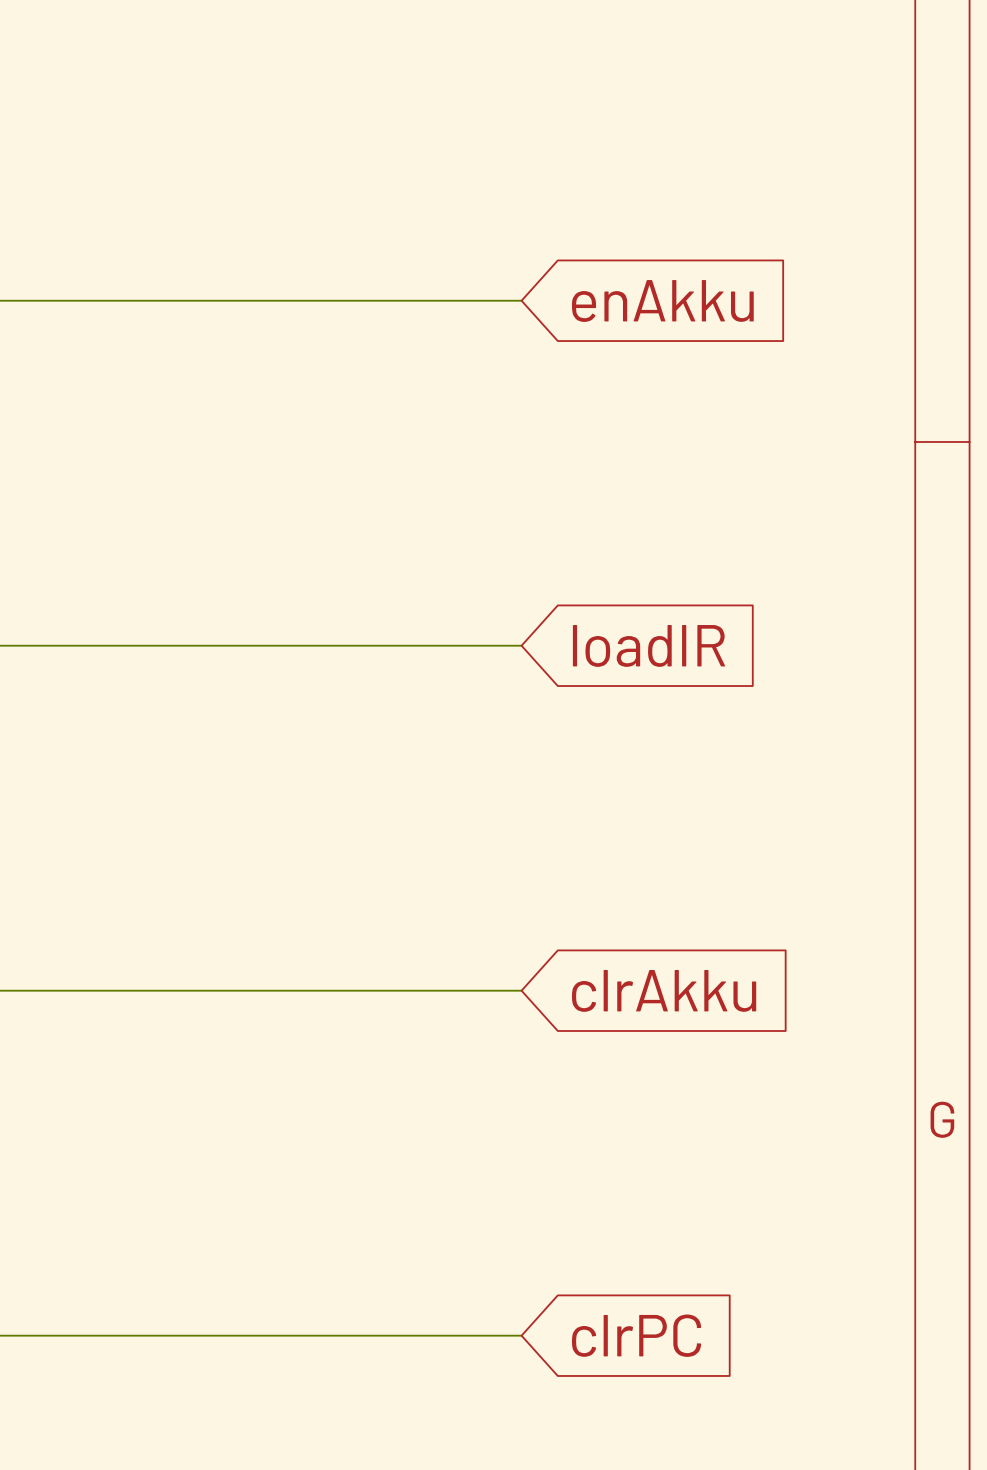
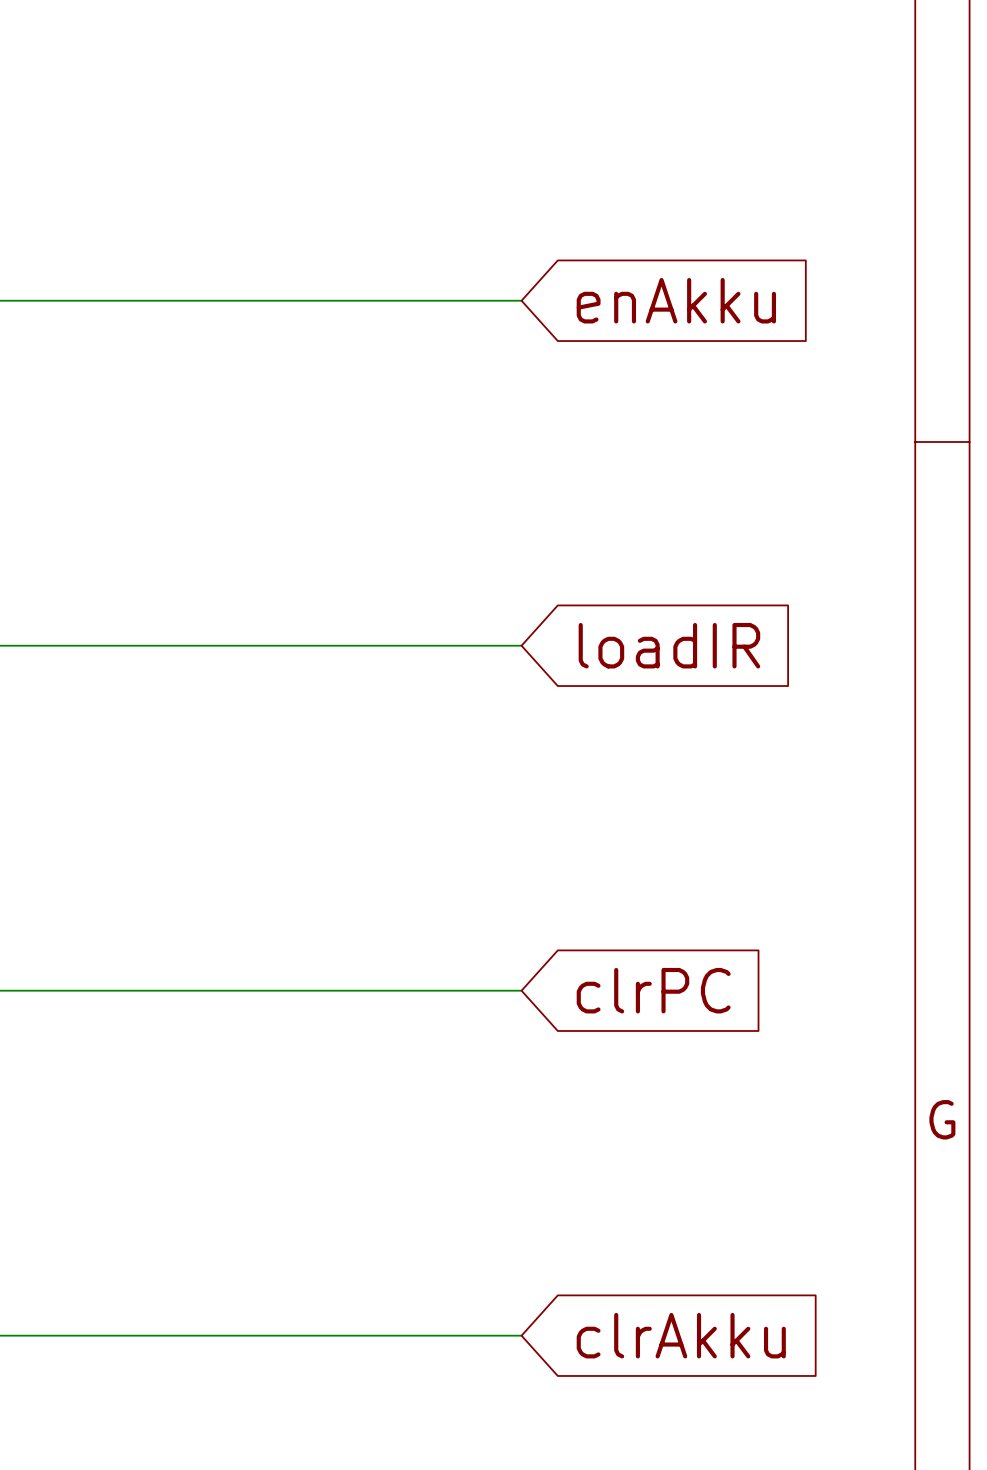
global label: clrAkku (664, 990) -> clrPC (653, 990)
global label: clrPC (636, 1335) -> clrAkku (681, 1335)

